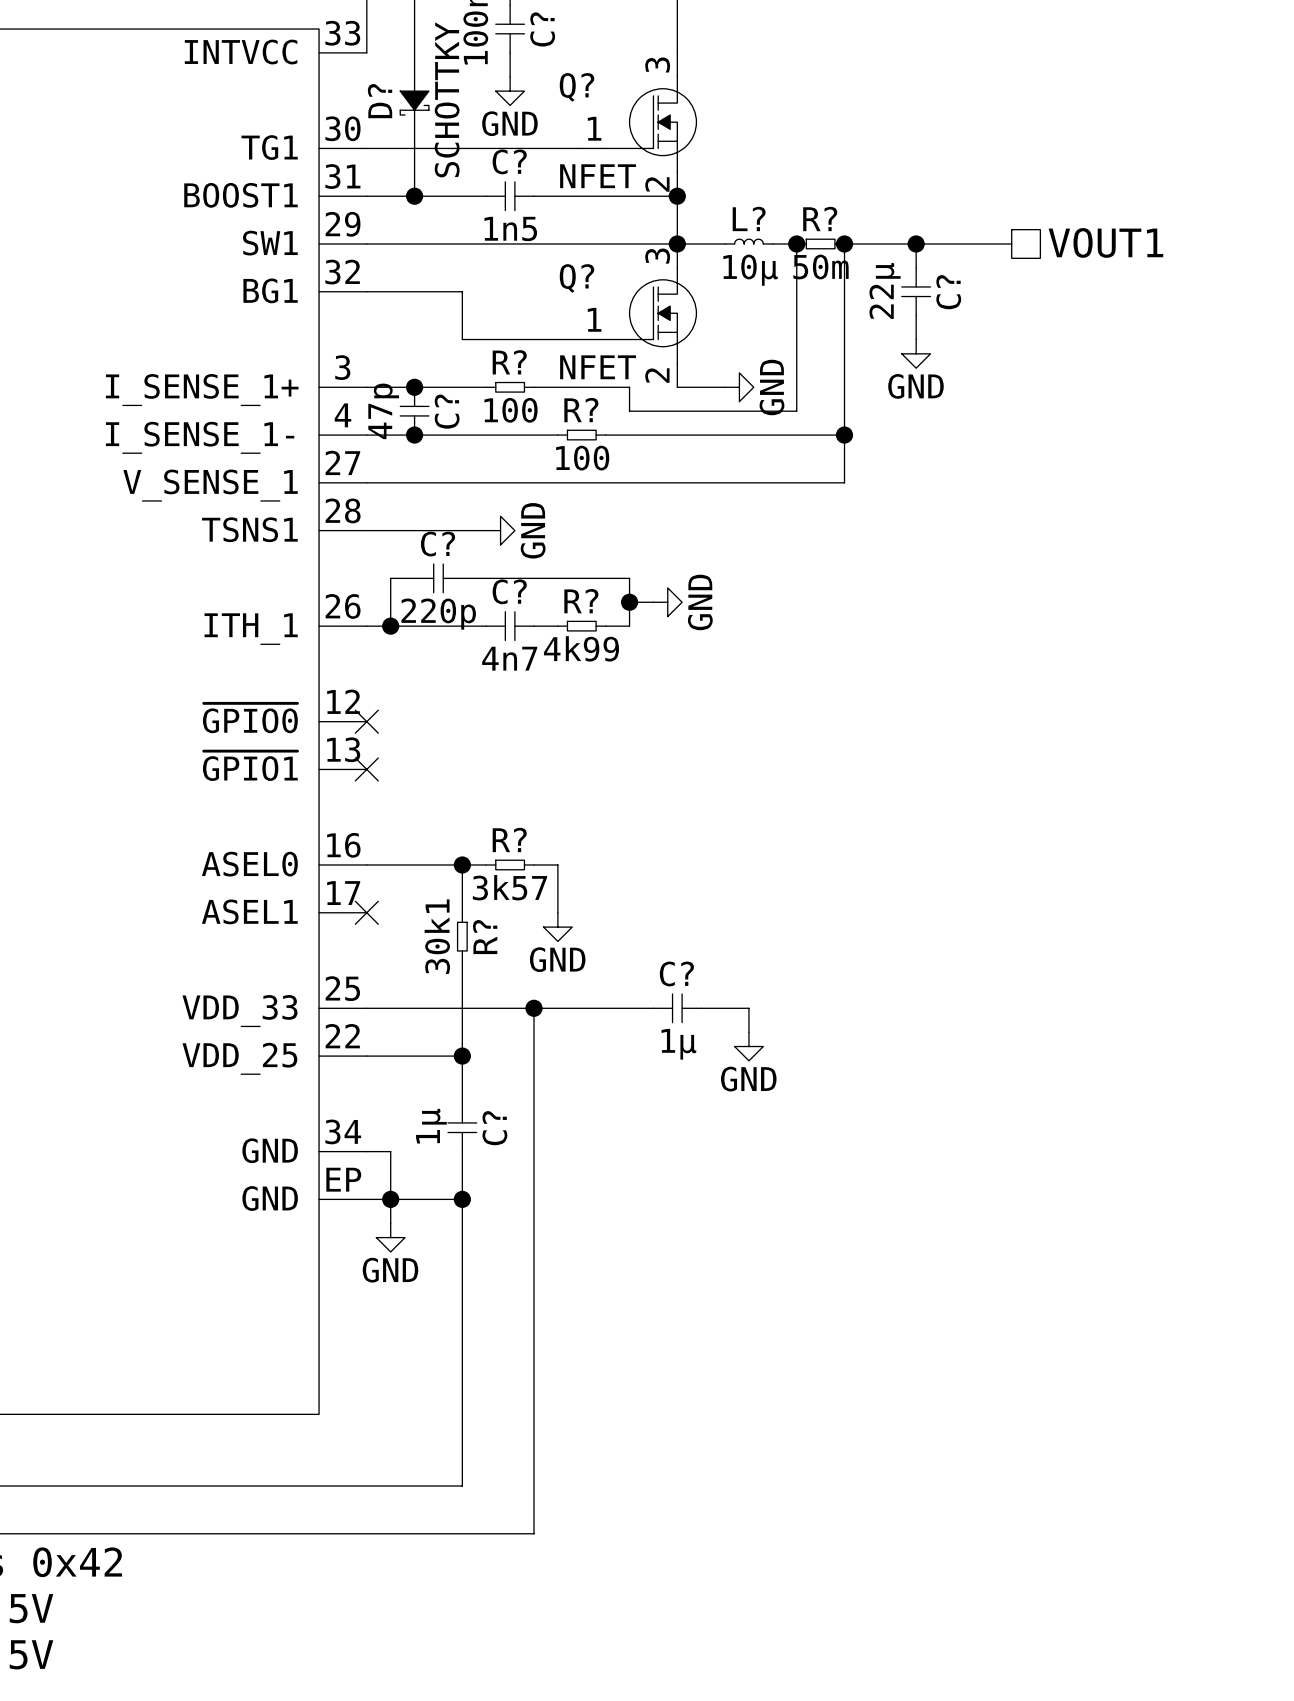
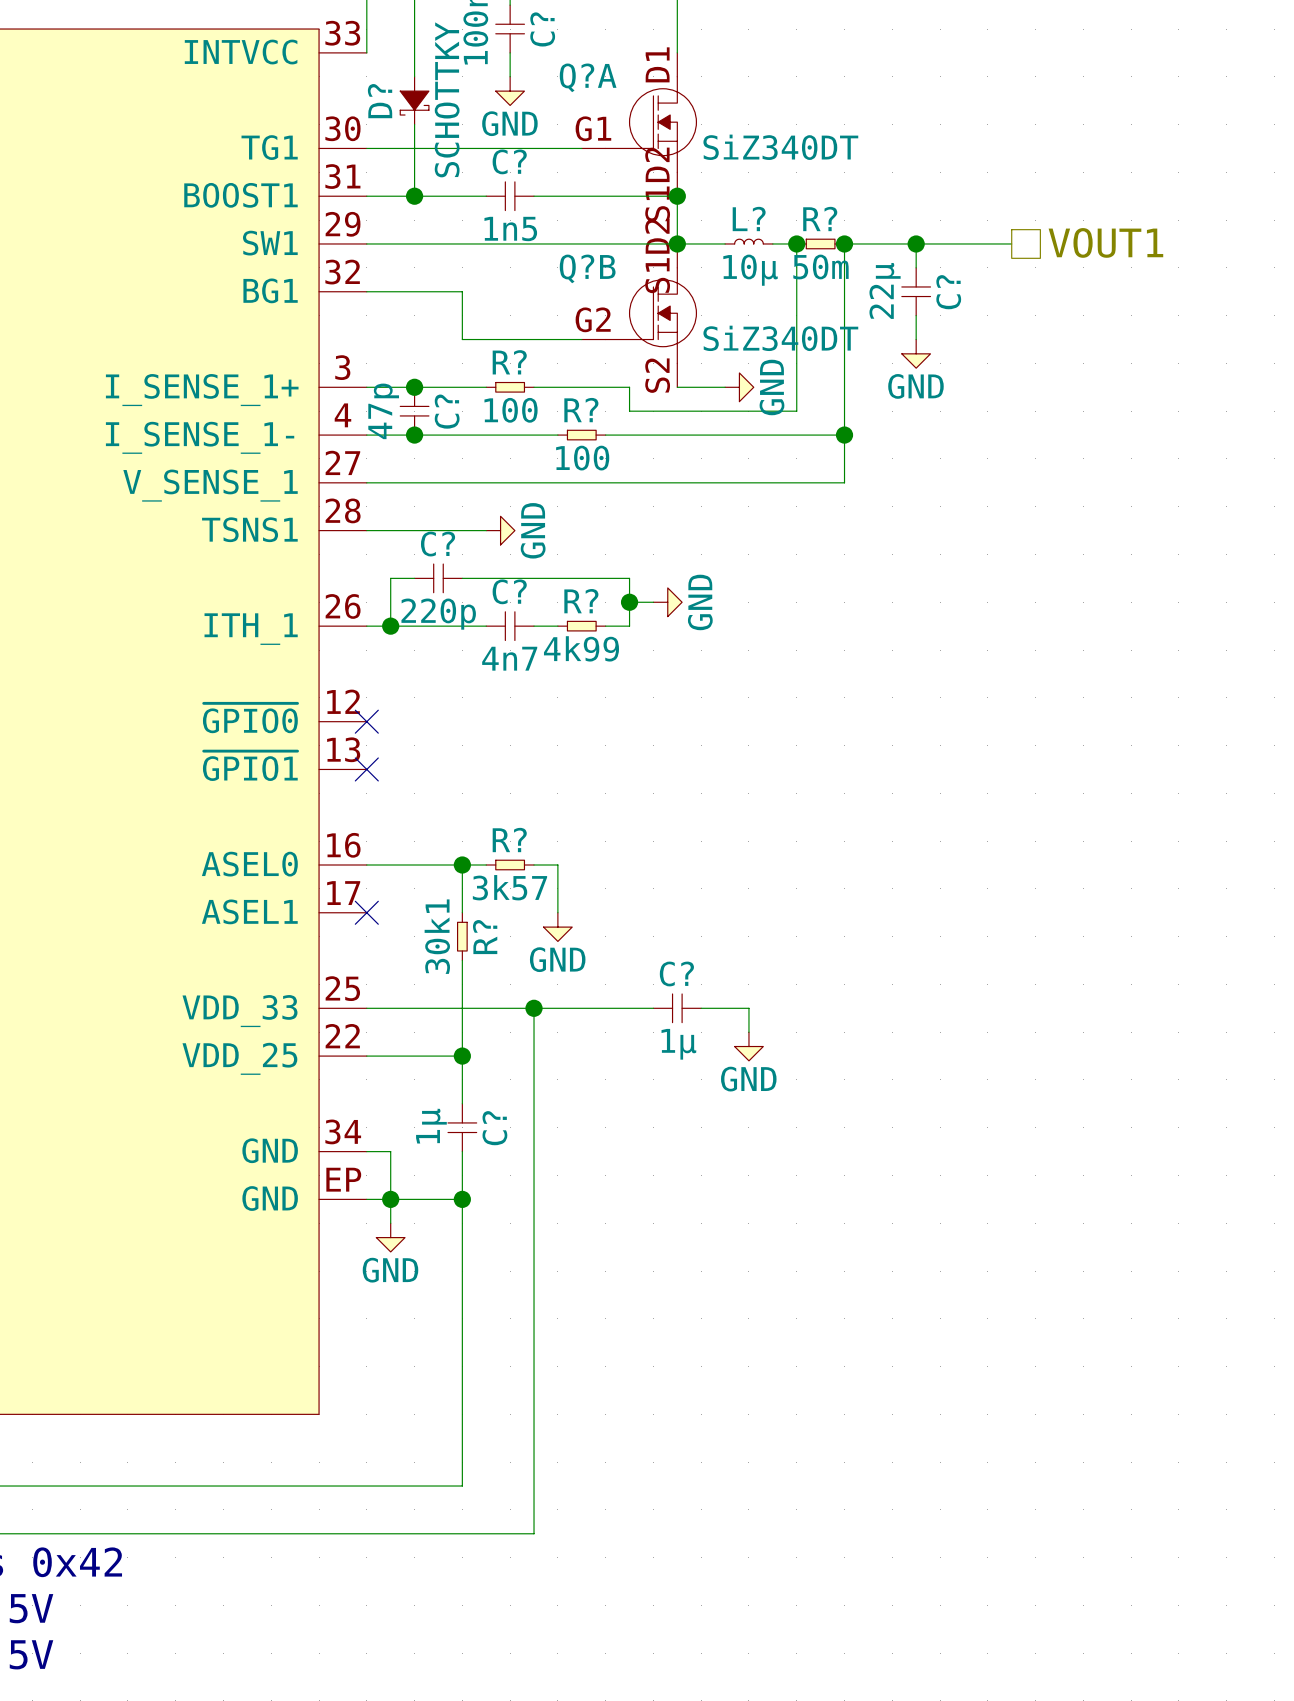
Q? pin number: 3 (657, 64) -> D1 (657, 64)
Q? name: Q? (577, 87) -> Q?A (588, 77)
Q? pin number: 1 (594, 128) -> G1 (593, 128)
Q? value: NFET (598, 176) -> SiZ340DT (780, 147)
Q? pin number: 2 (657, 184) -> S1D2 (657, 184)
Q? pin number: 3 (657, 256) -> S1D2 (657, 256)
Q? name: Q? (577, 278) -> Q?B (587, 268)
Q? pin number: 1 (594, 319) -> G2 (593, 319)
Q? value: NFET (598, 367) -> SiZ340DT (780, 338)
Q? pin number: 2 (657, 375) -> S2 (657, 375)

